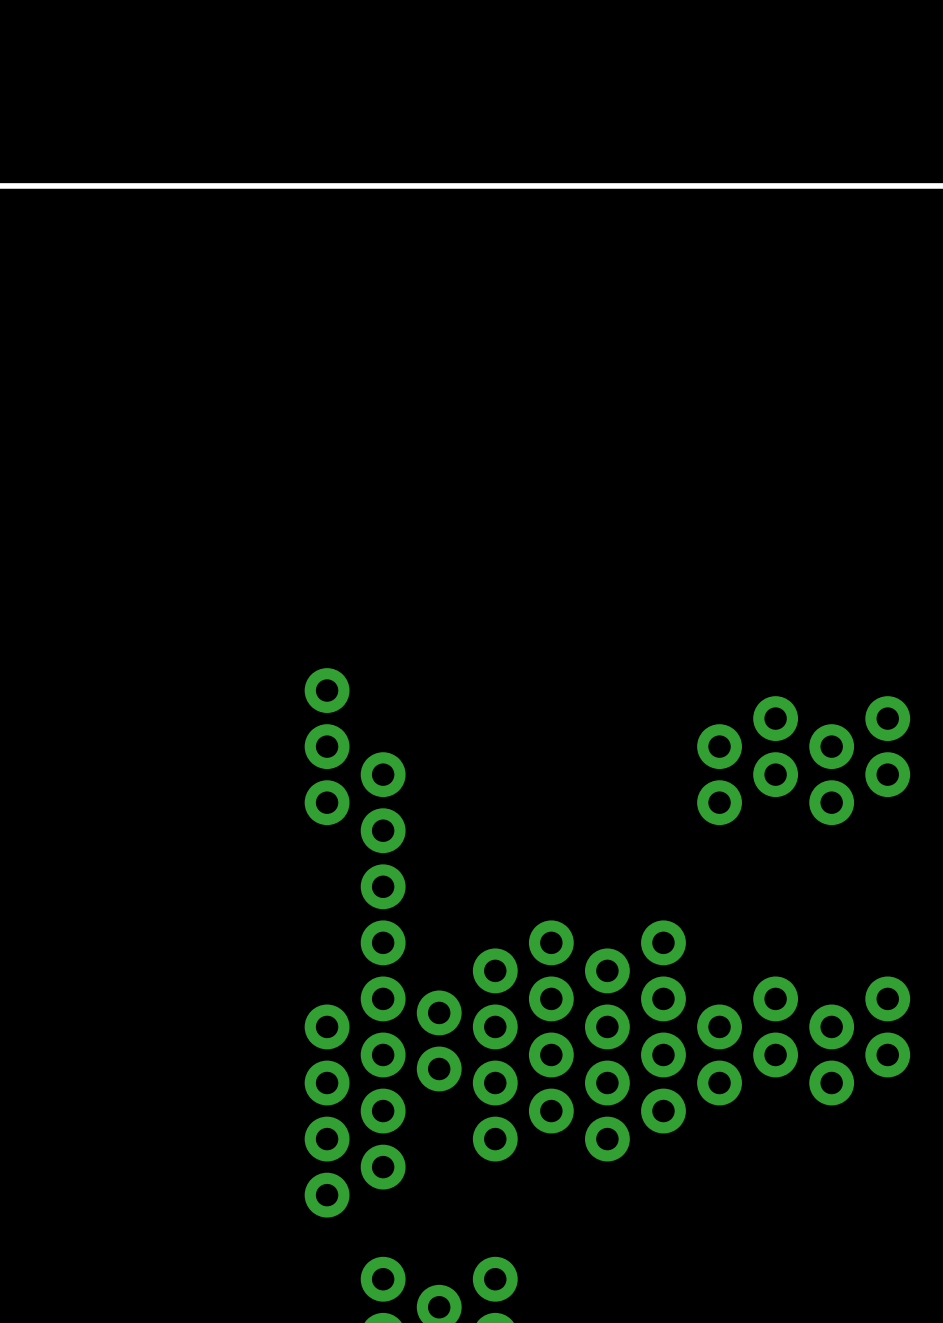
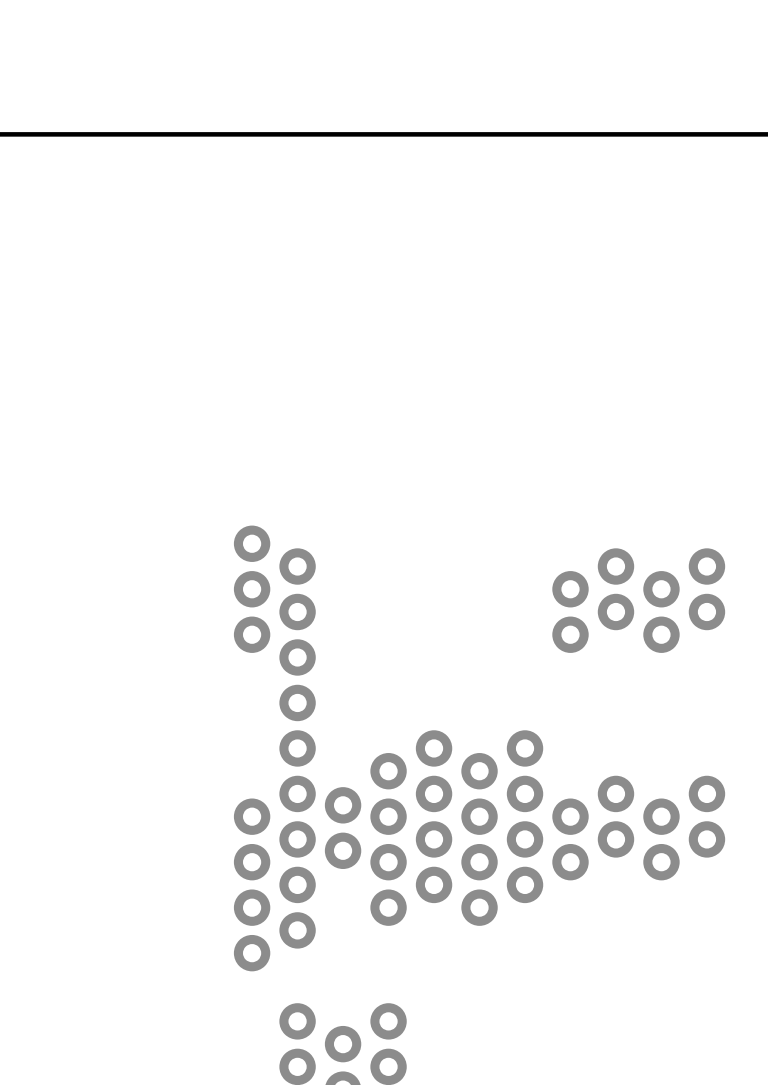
part: none -> (297, 566)

